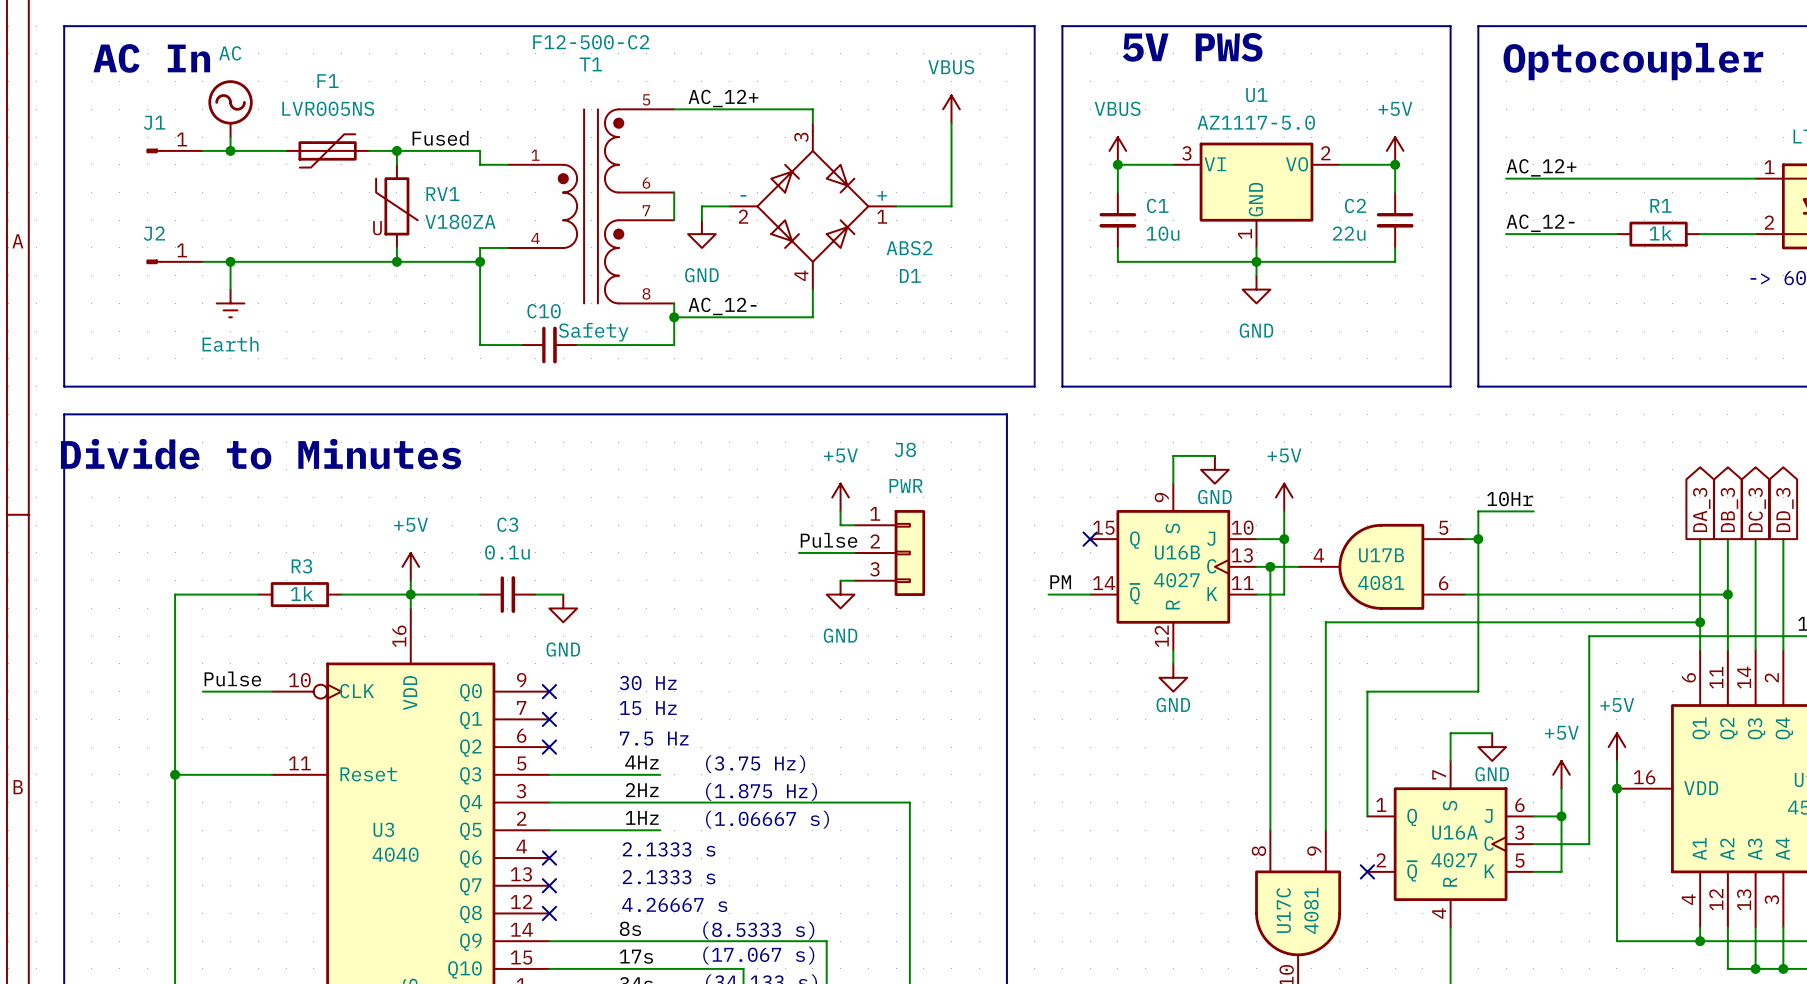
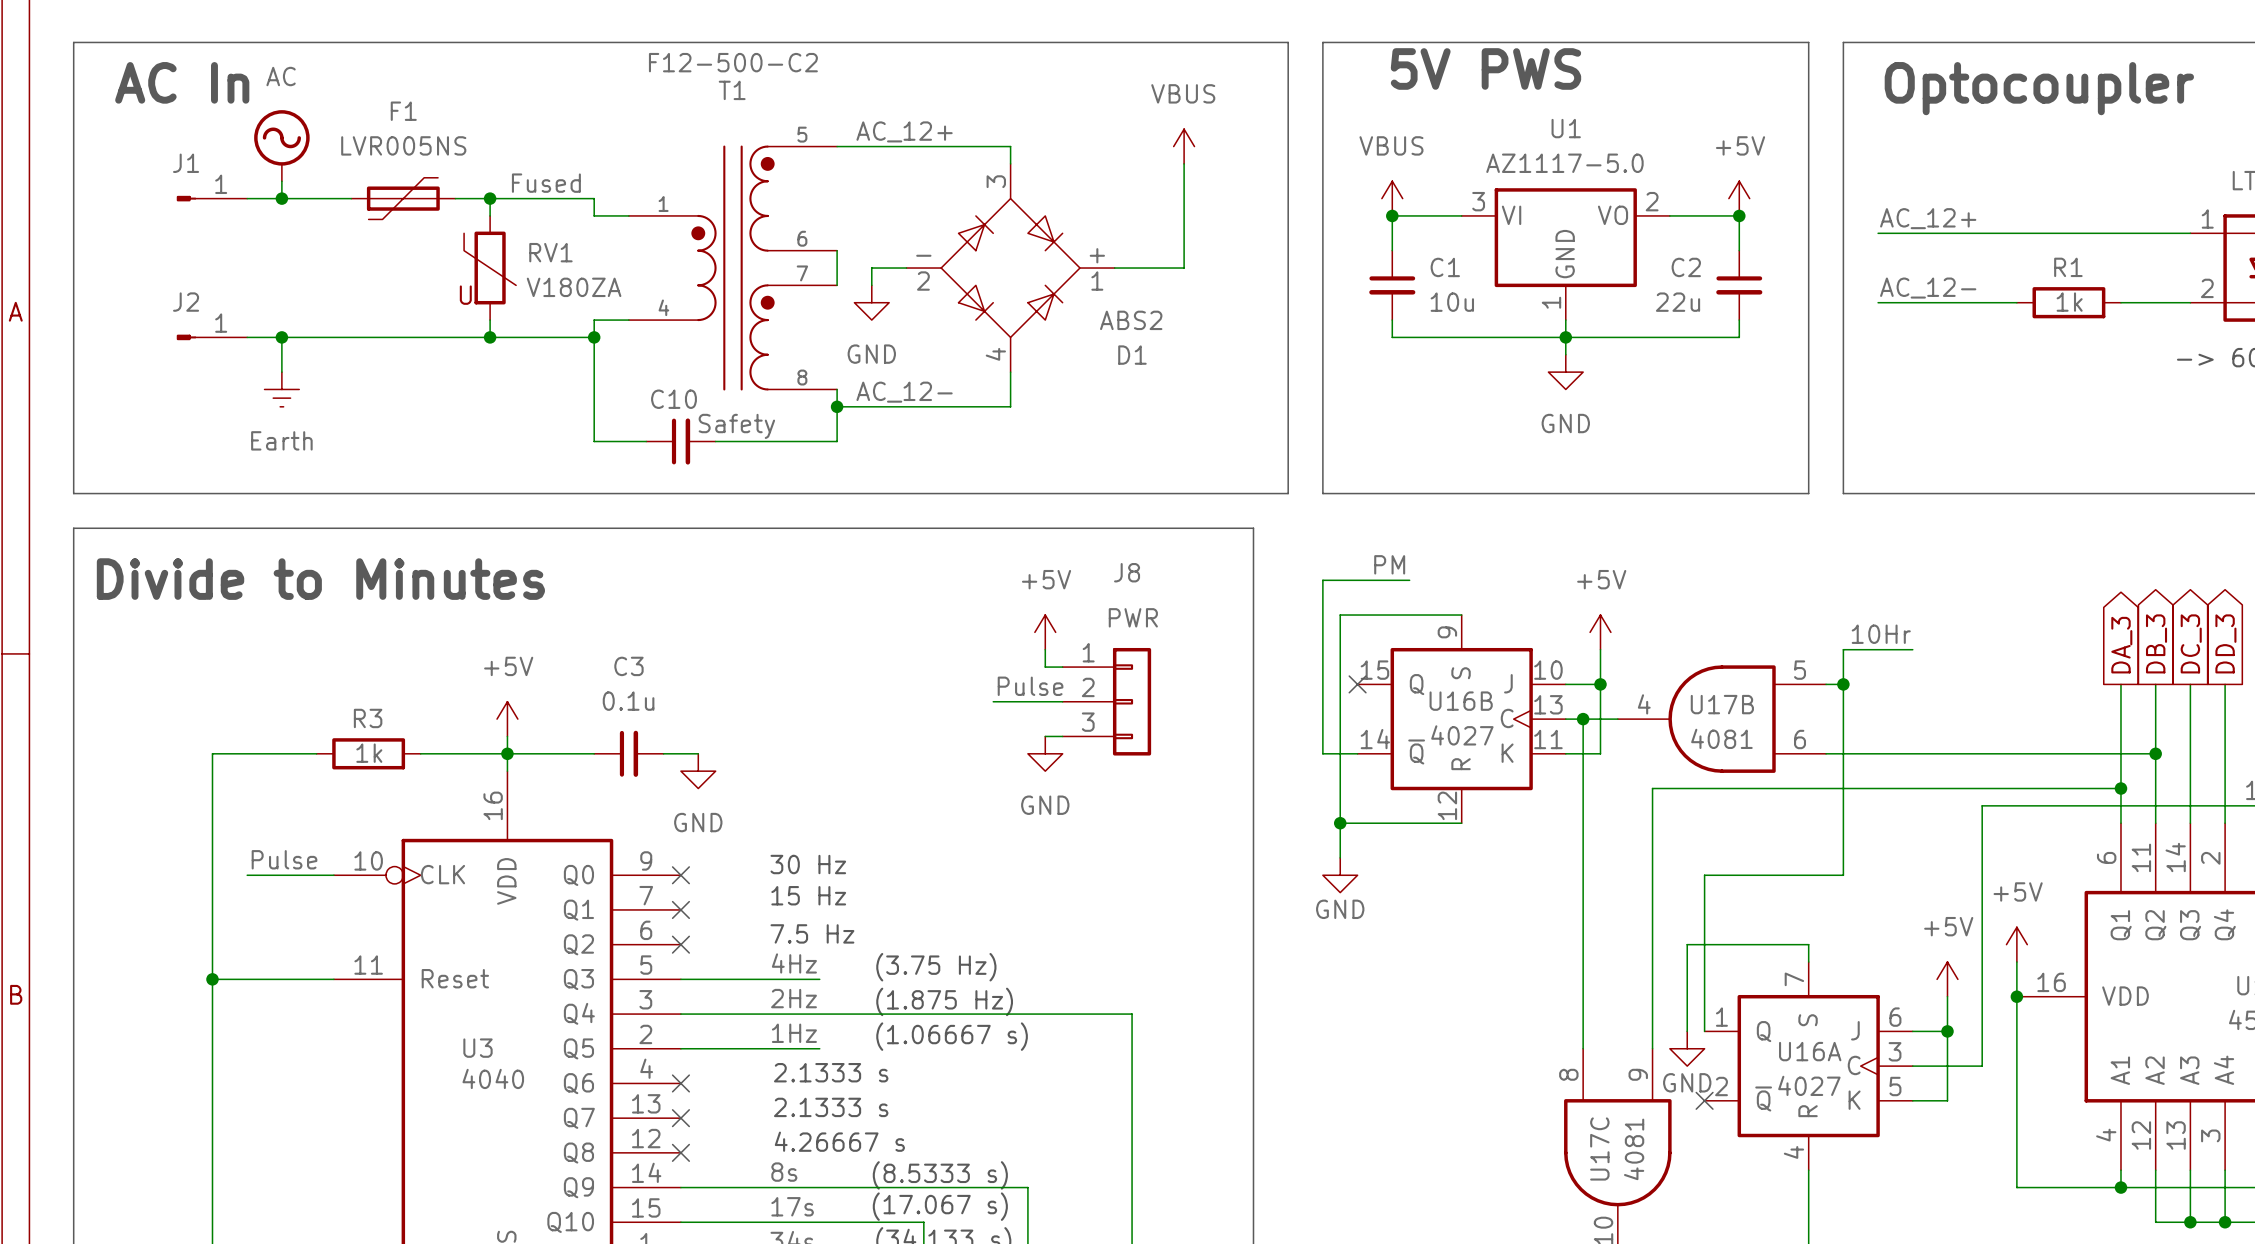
wire: (1214, 455) (1173, 455) (1173, 483) -> (1340, 857) (1340, 615) (1461, 615)
power symbol: GND (1214, 469) -> none
label position: PM (1060, 582) -> PM (1389, 564)
wire: (1048, 594) (1062, 594) -> (1409, 580) (1322, 580) (1322, 753)
junction: none -> (1340, 823)
wire: (1173, 650) (1173, 663) -> (1461, 823) (1340, 823)
power symbol position: GND (1173, 677) -> GND (1340, 875)
wire: (1492, 733) (1450, 733) (1450, 747) -> (1687, 1031) (1687, 944) (1808, 944)
power symbol: GND (1492, 747) -> none
power symbol: none -> GND (1687, 1048)

